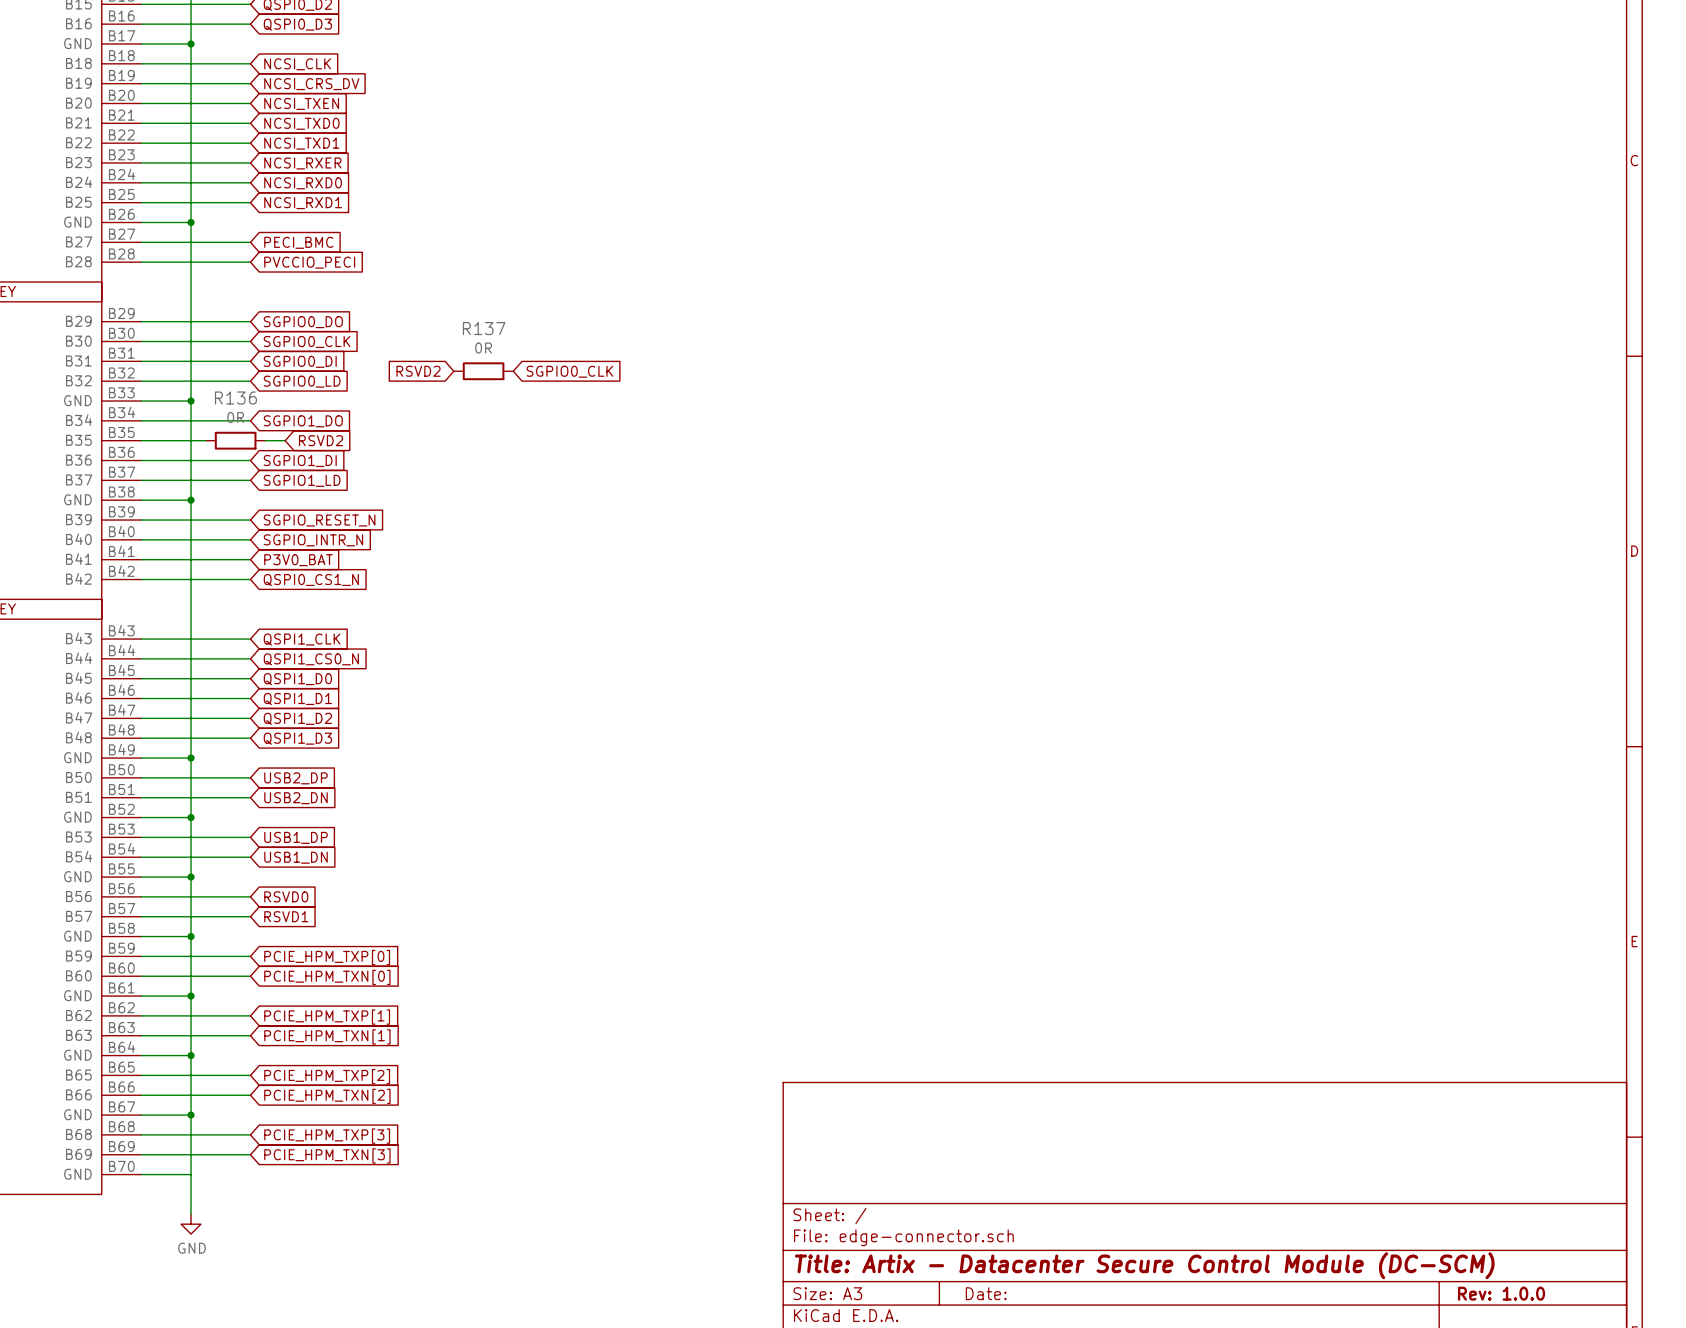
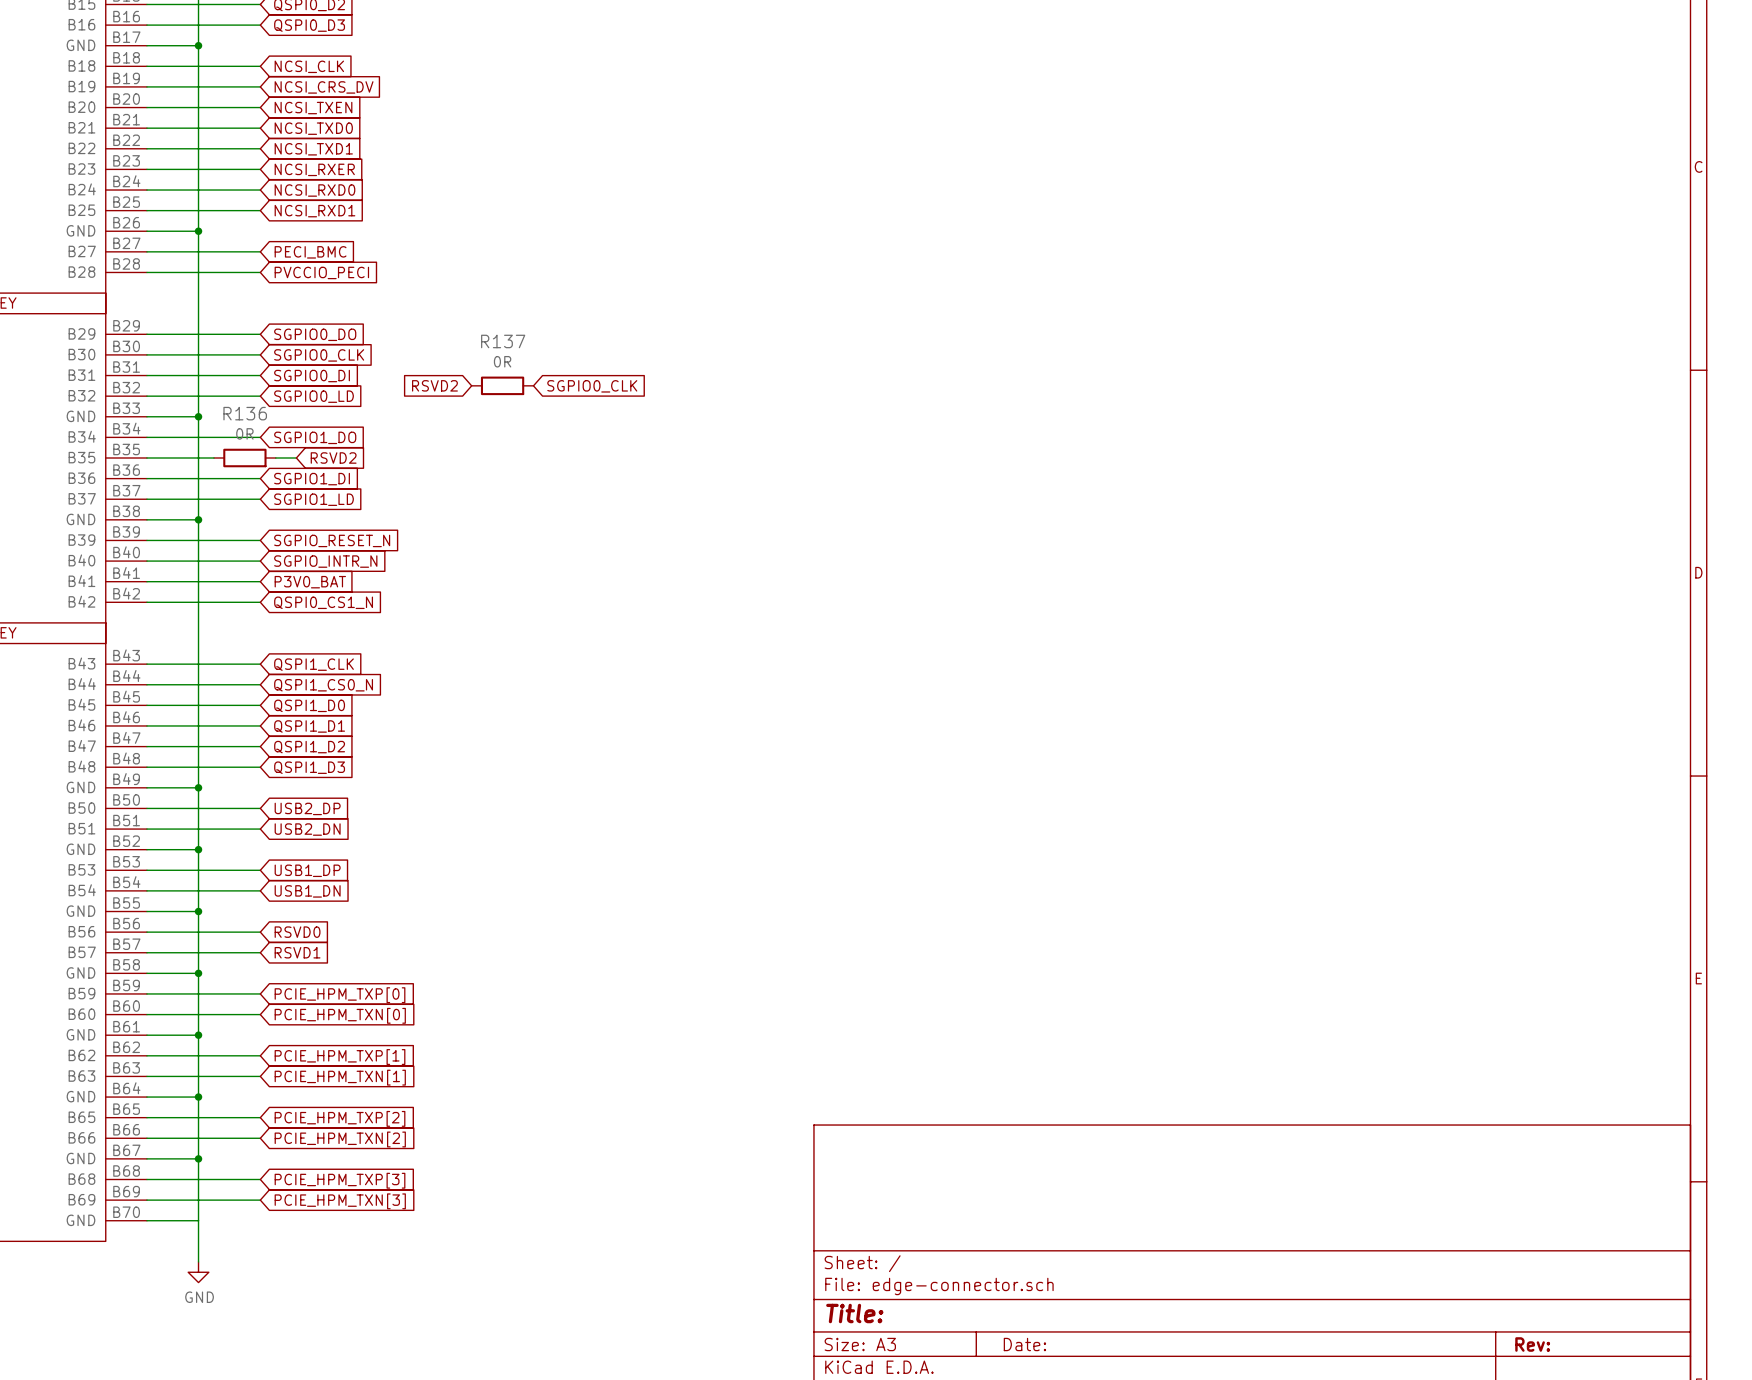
title block: Title: Artix - Datacenter Secure Control Module (DC-SCM) (1144, 1265) -> Title: (854, 1313)
title block: Rev: 1.0.0 (1501, 1293) -> Rev: (1532, 1344)

